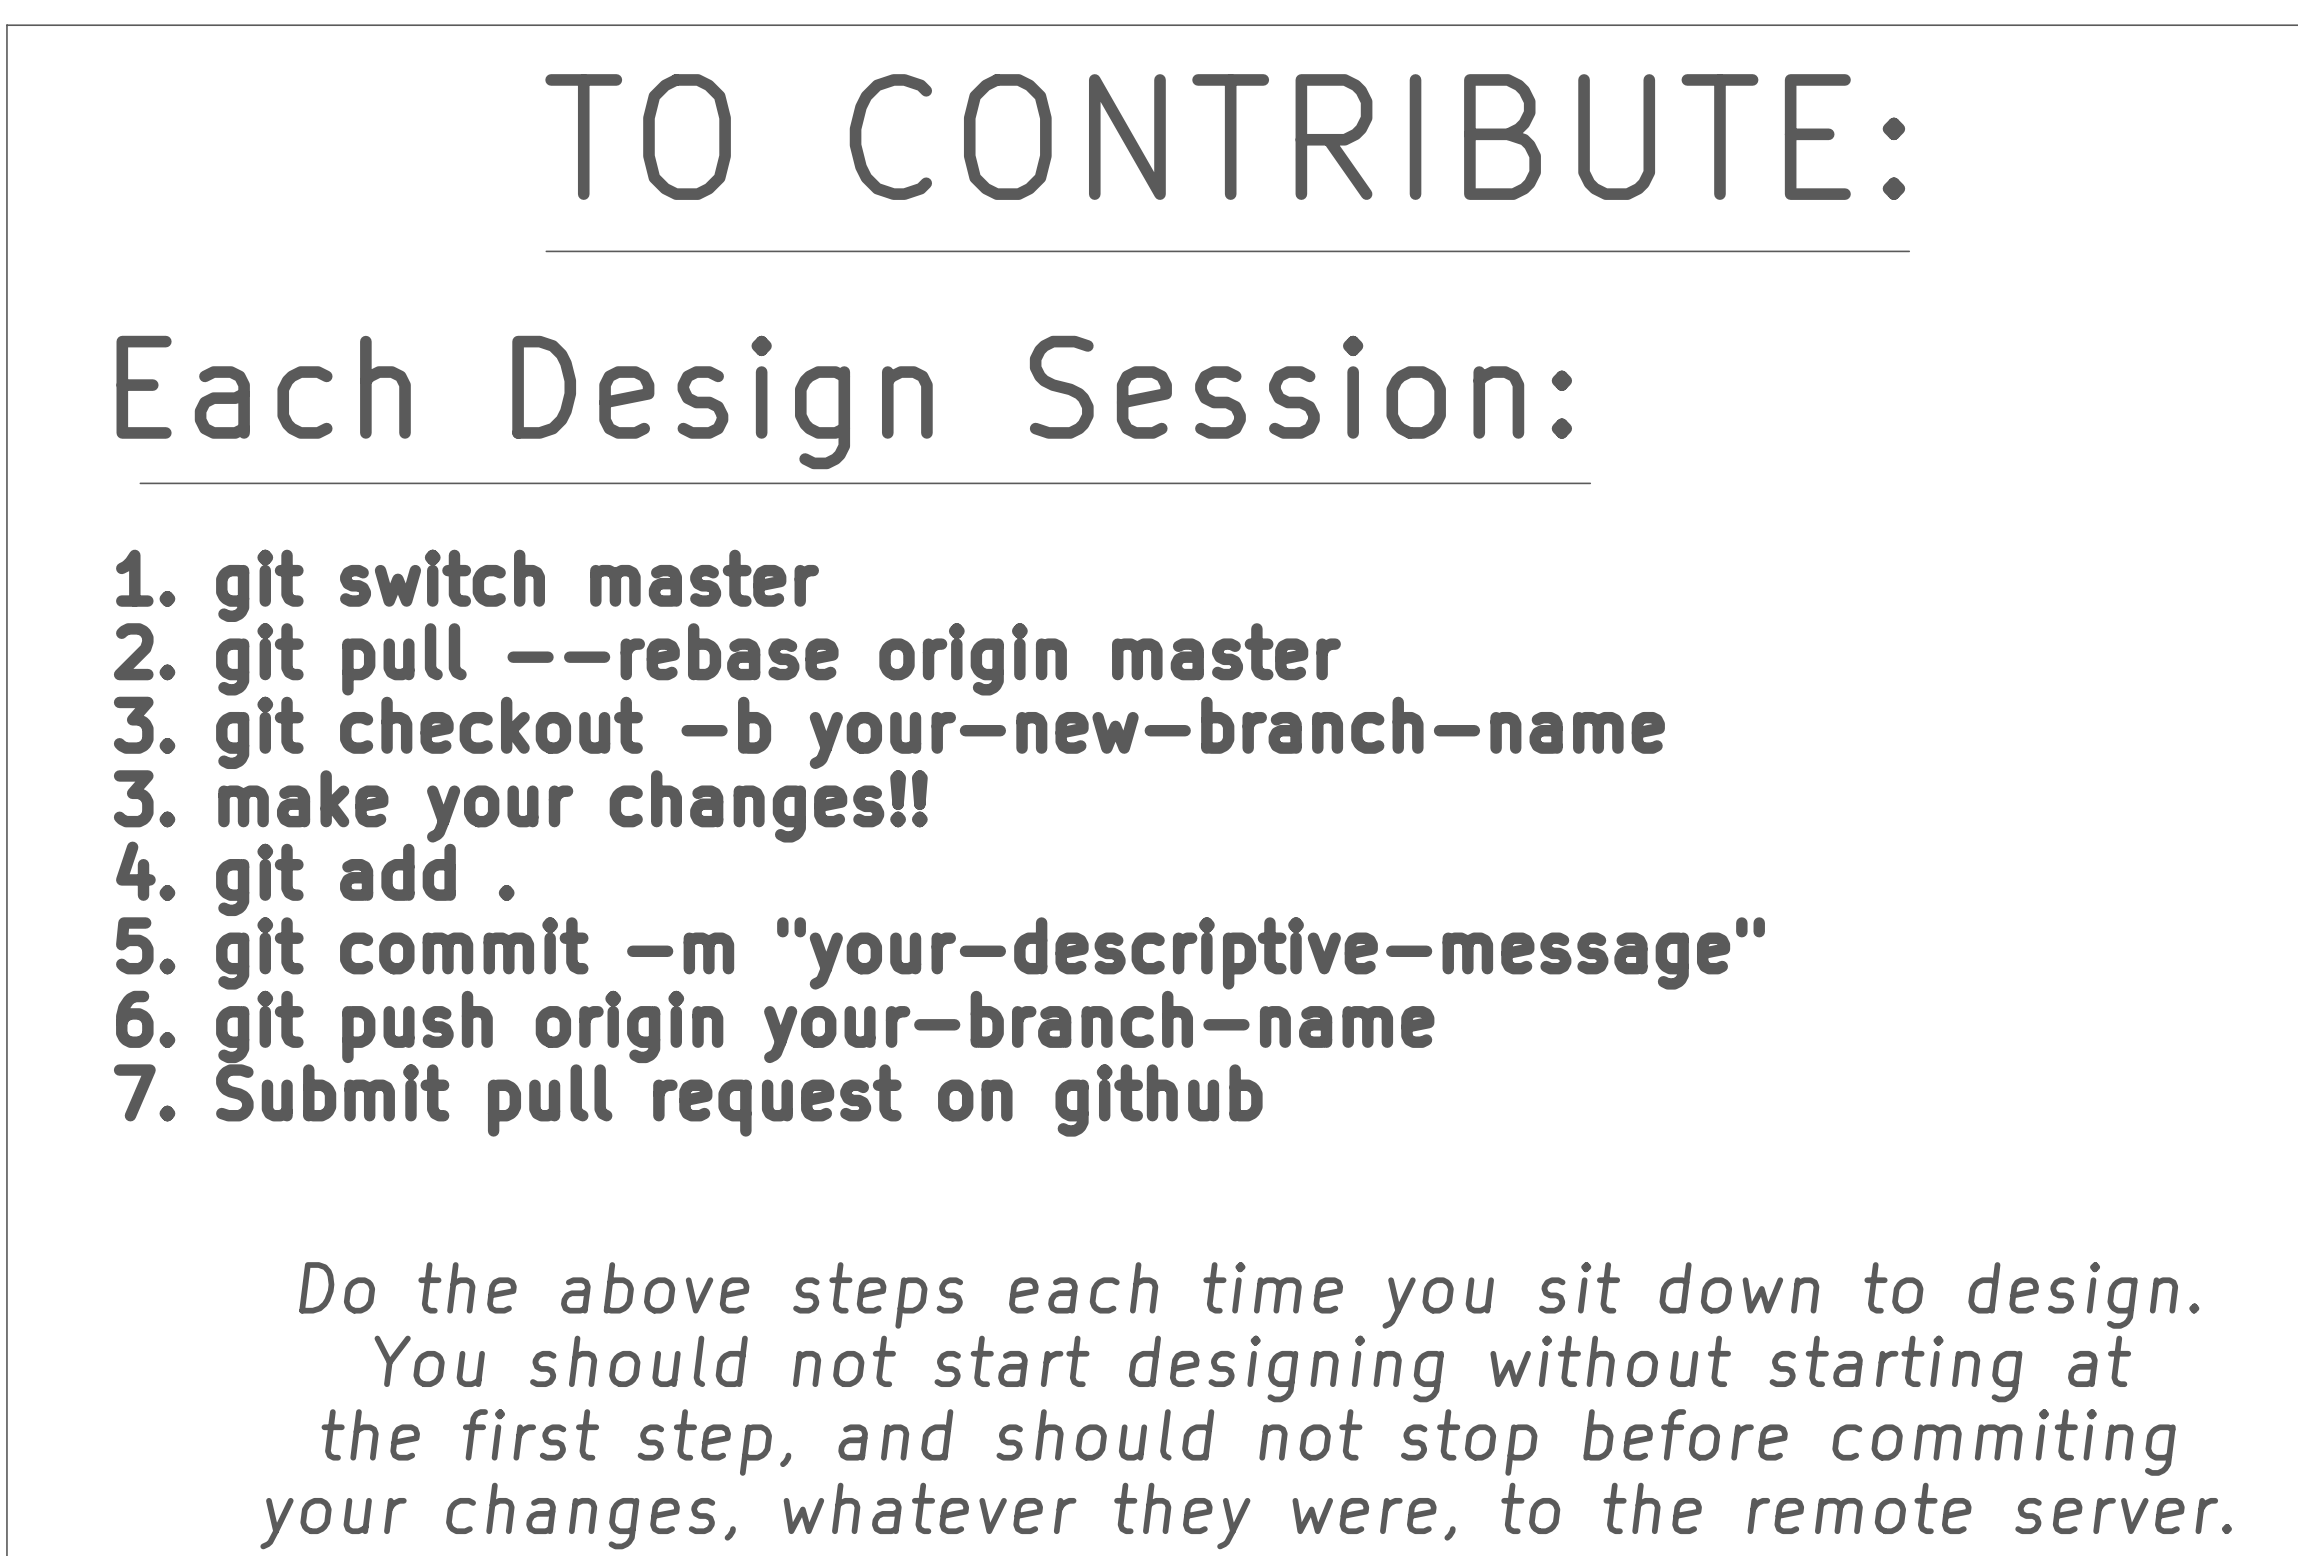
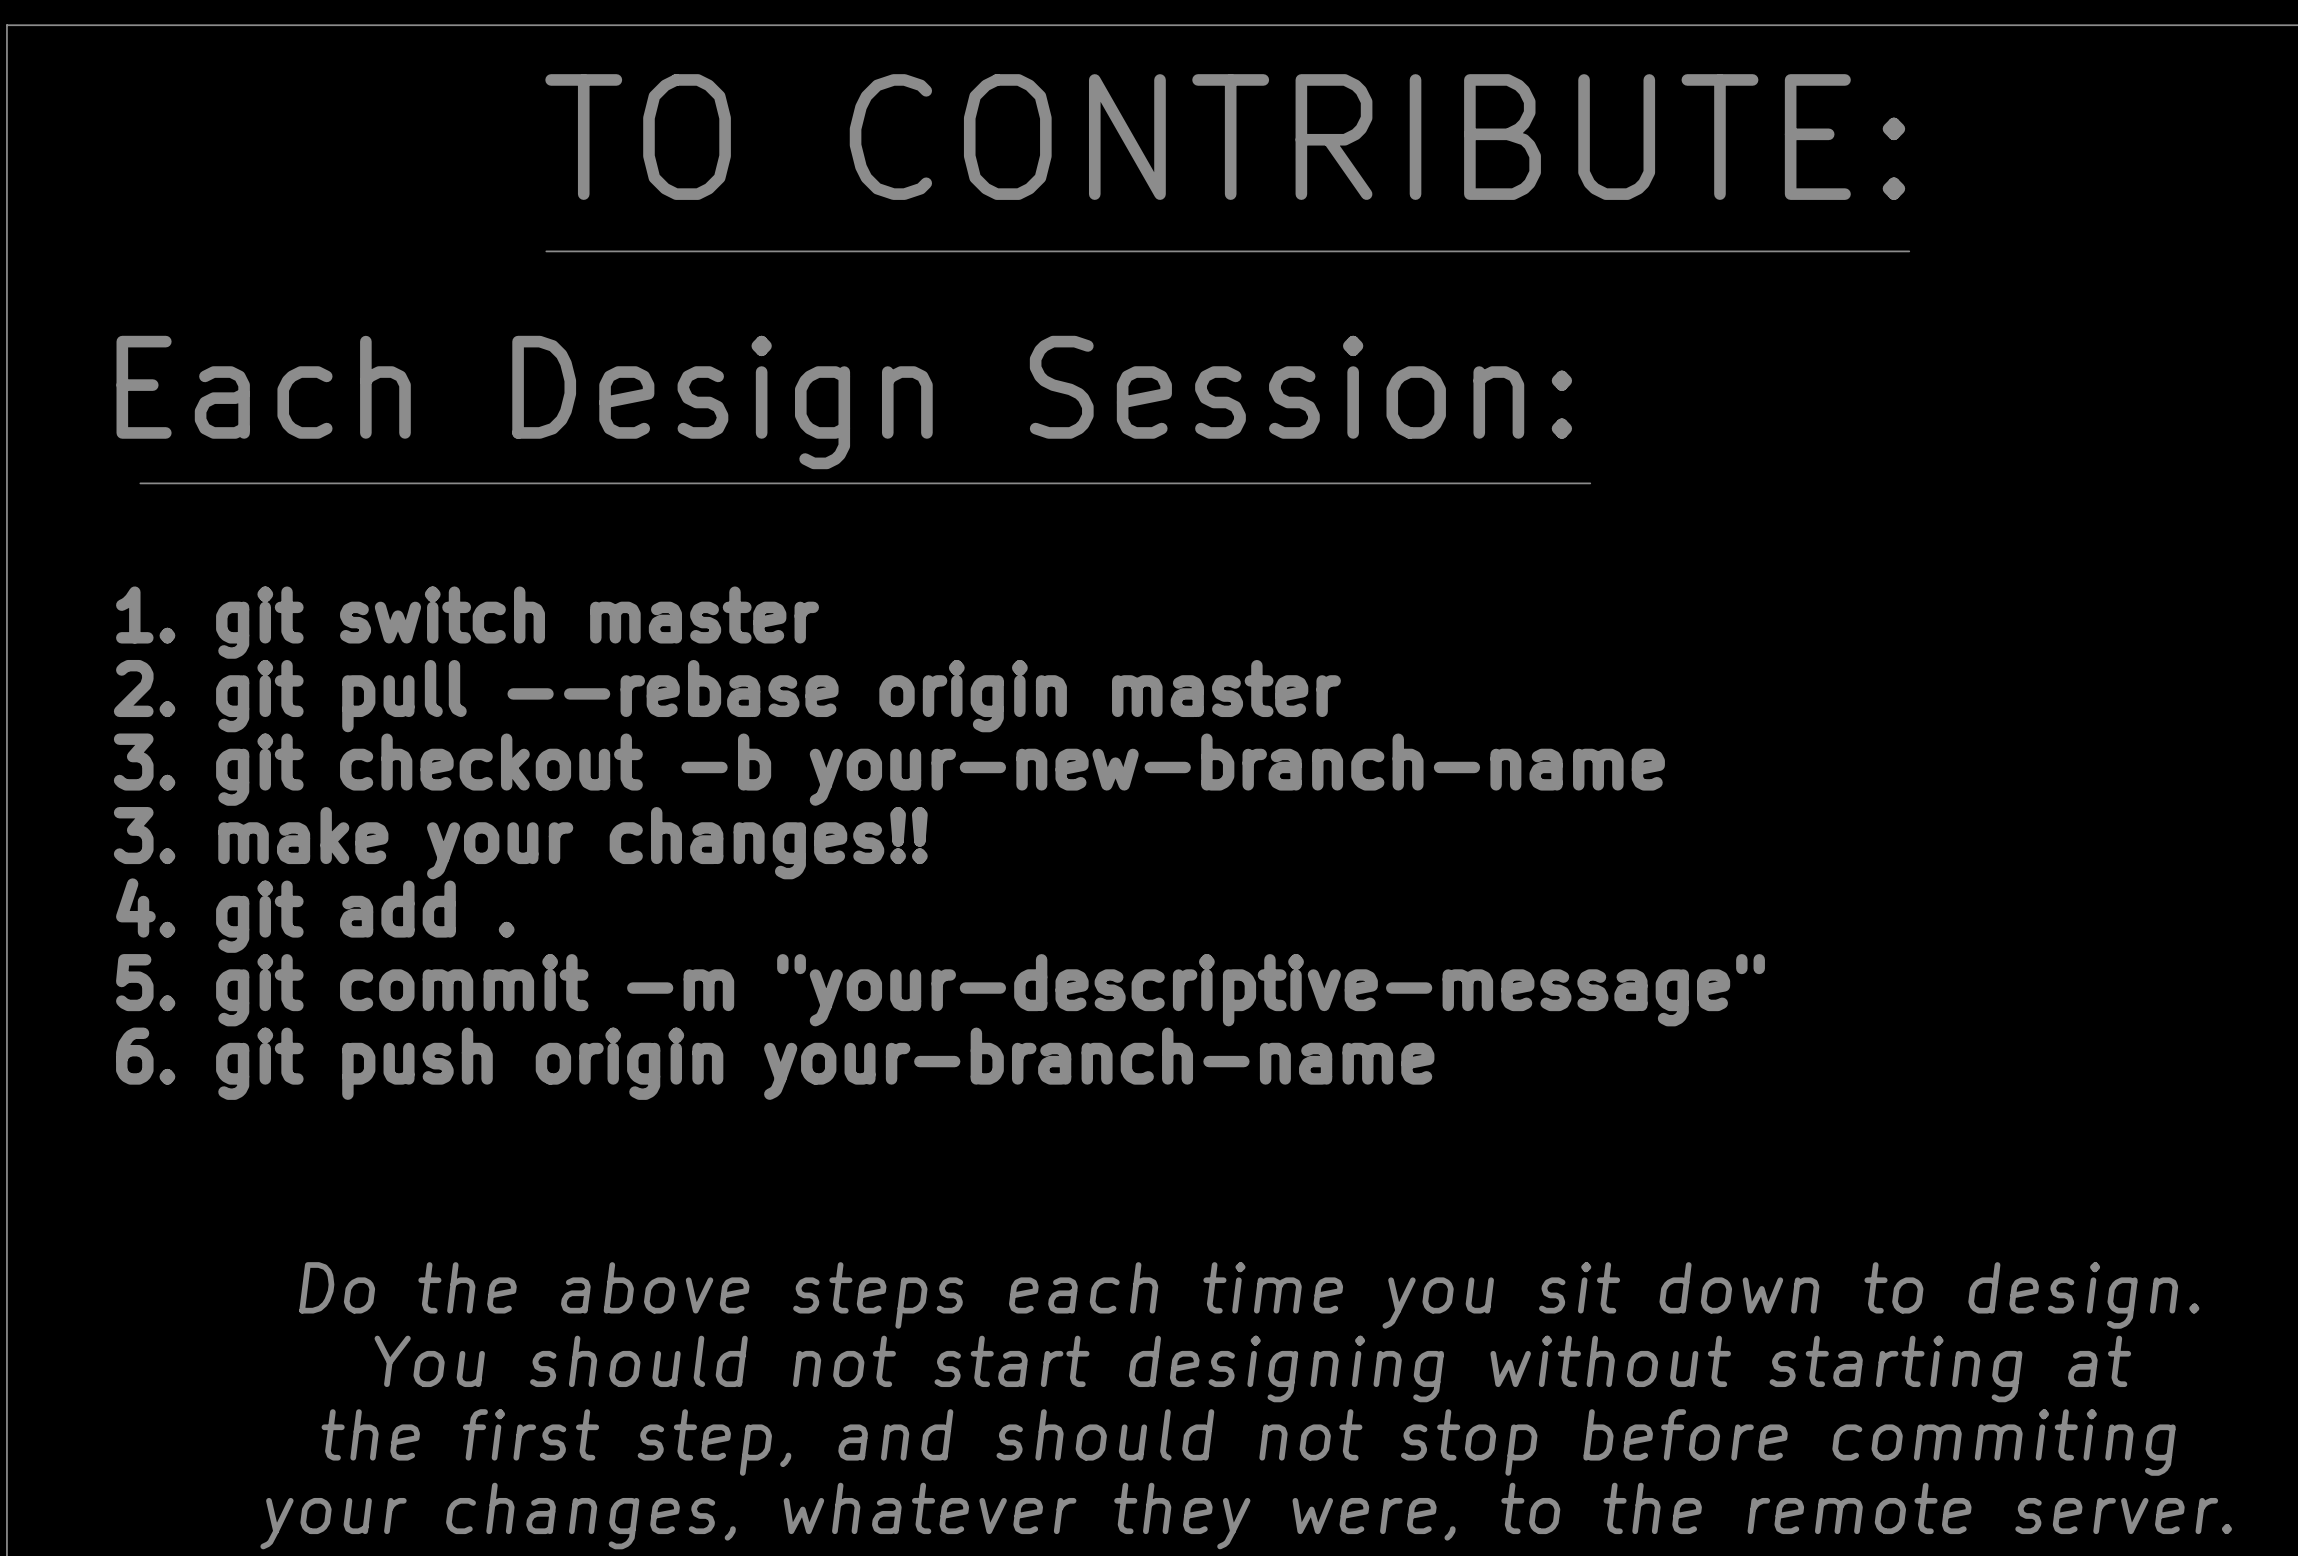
text position: 1. git switch master (467, 585) -> 1. git switch master (467, 622)
text position: 2. git pull --rebase origin master (727, 659) -> 2. git pull --rebase origin master (727, 696)
text position: 3. git checkout -b your-new-branch-name (889, 732) -> 3. git checkout -b your-new-branch-name (889, 769)
text position: 3. make your changes!! (520, 806) -> 3. make your changes!! (520, 843)
text position: 4. git add . (315, 878) -> 4. git add . (315, 915)
text position: 5. git commit -m "your-descriptive-message" (940, 953) -> 5. git commit -m "your-descriptive-message" (940, 990)
text position: 6. git push origin your-branch-name (775, 1026) -> 6. git push origin your-branch-name (775, 1063)
text: 7. Submit pull request on github (688, 1100) -> none

